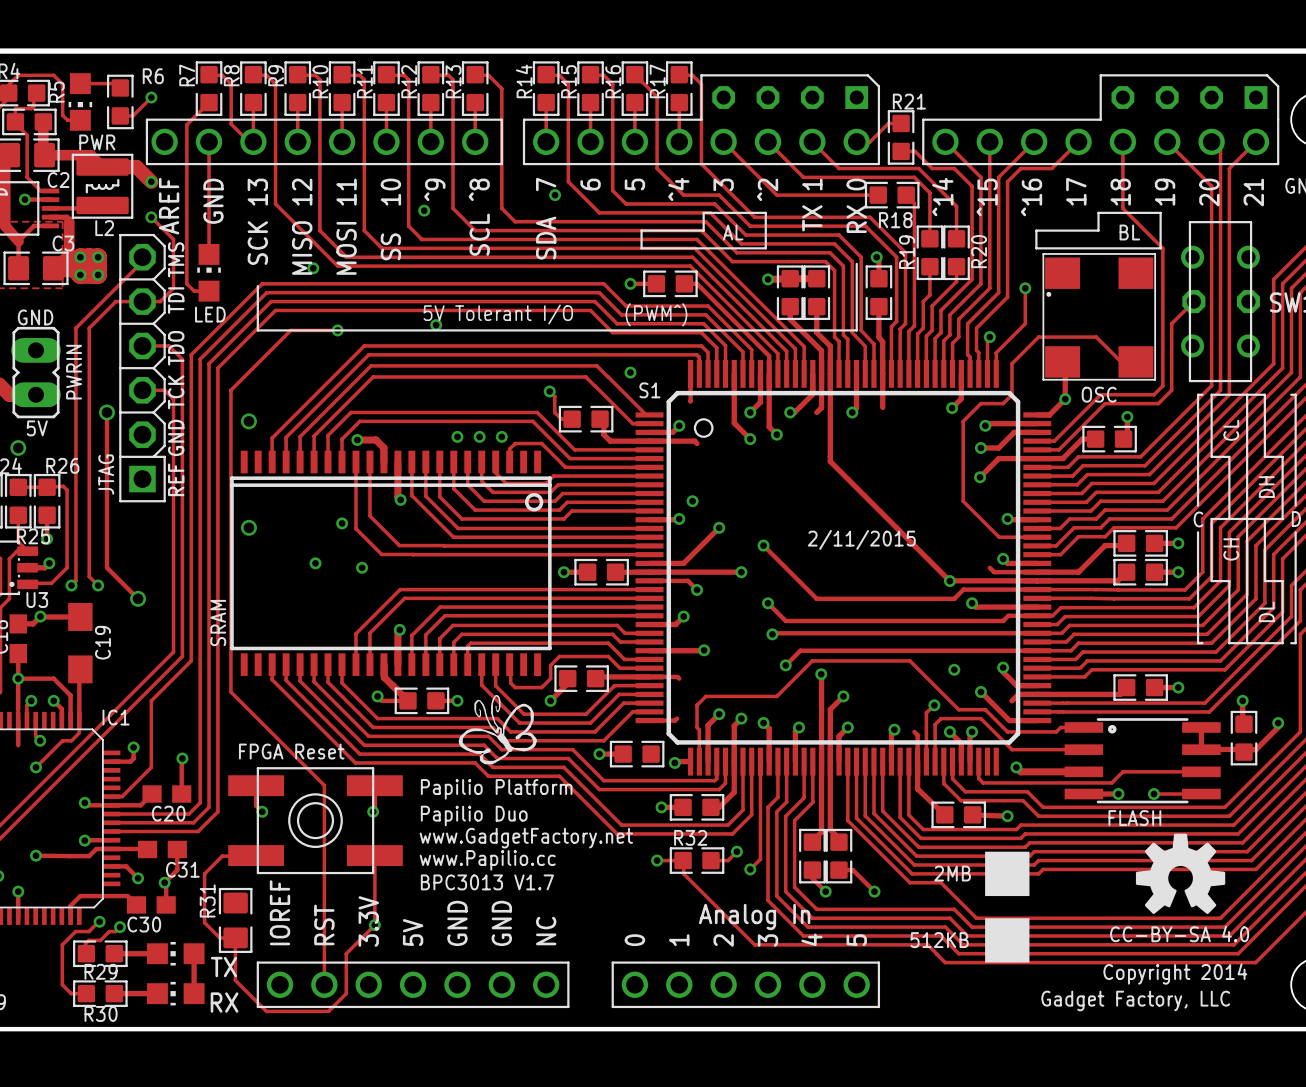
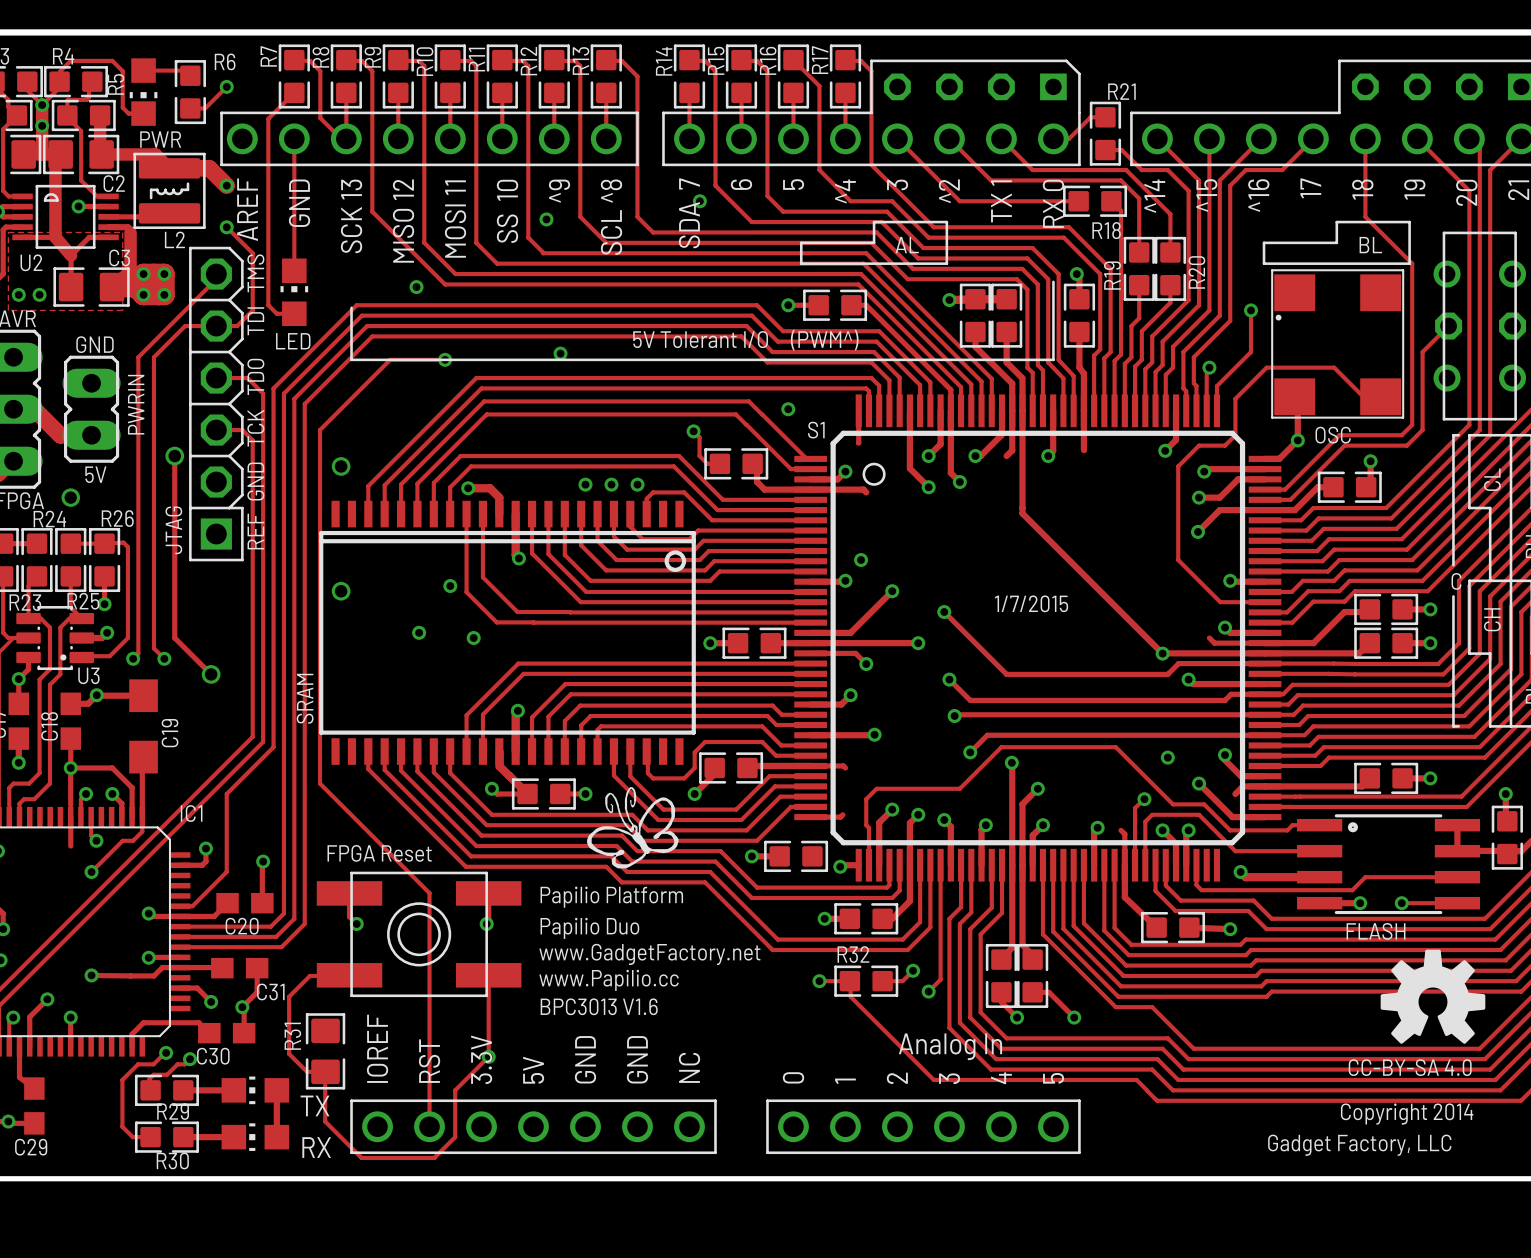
text: 2/11/2015 (861, 539) -> 1/7/2015 (1031, 603)
drawing: [985, 851, 1030, 897] -> none
text: 2MB (952, 873) -> none
text: BPC3013 V1.7 (487, 882) -> BPC3013 V1.6 (599, 1006)
drawing: [985, 918, 1030, 963] -> none
text: 512KB (939, 940) -> none

